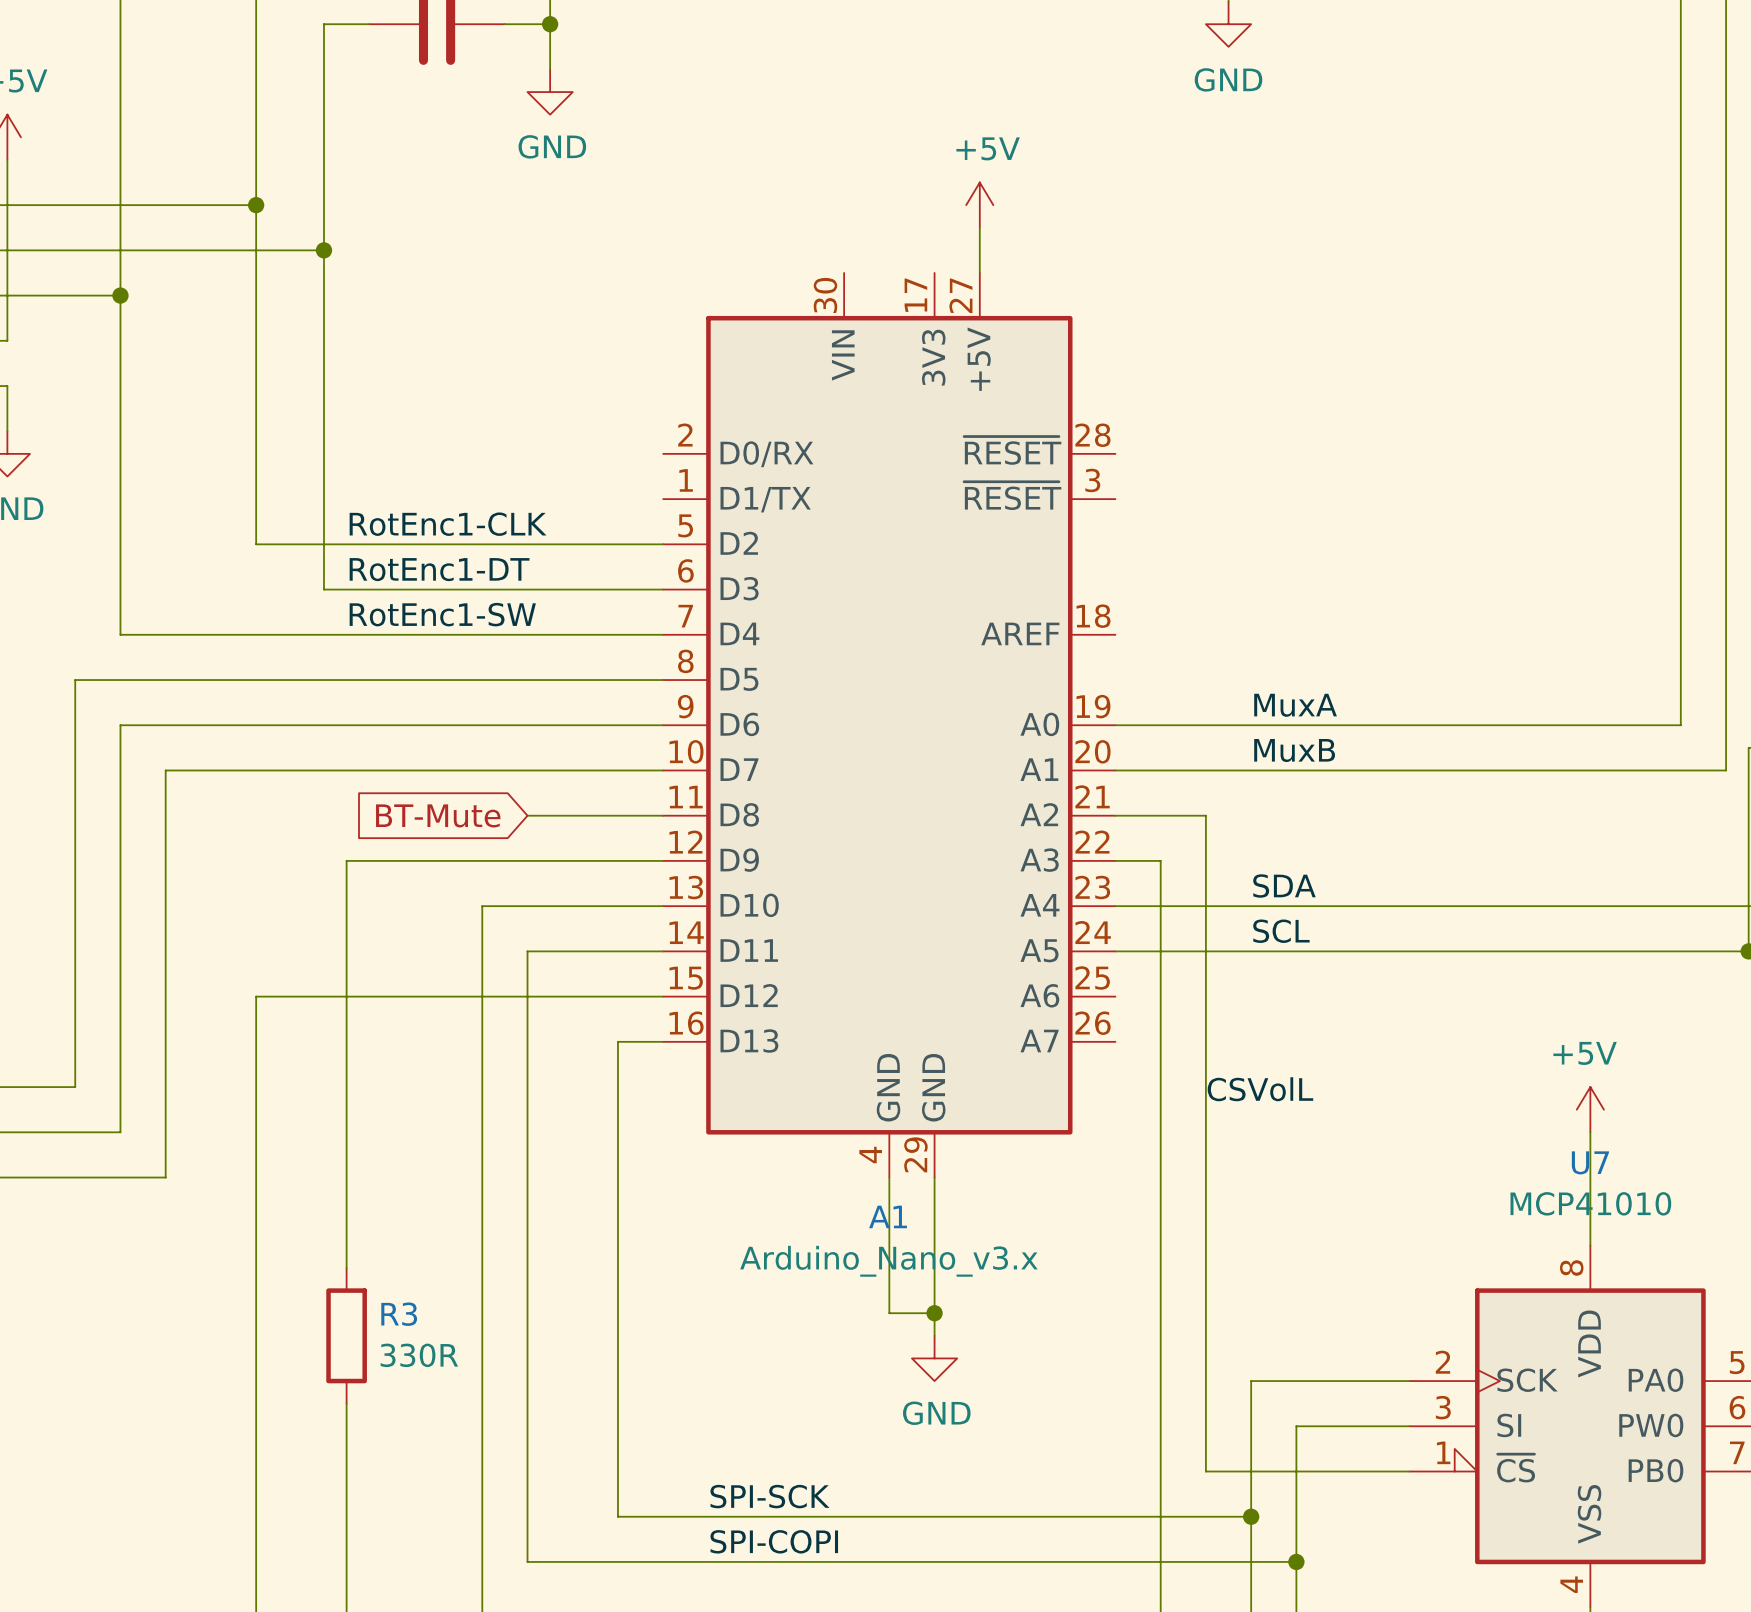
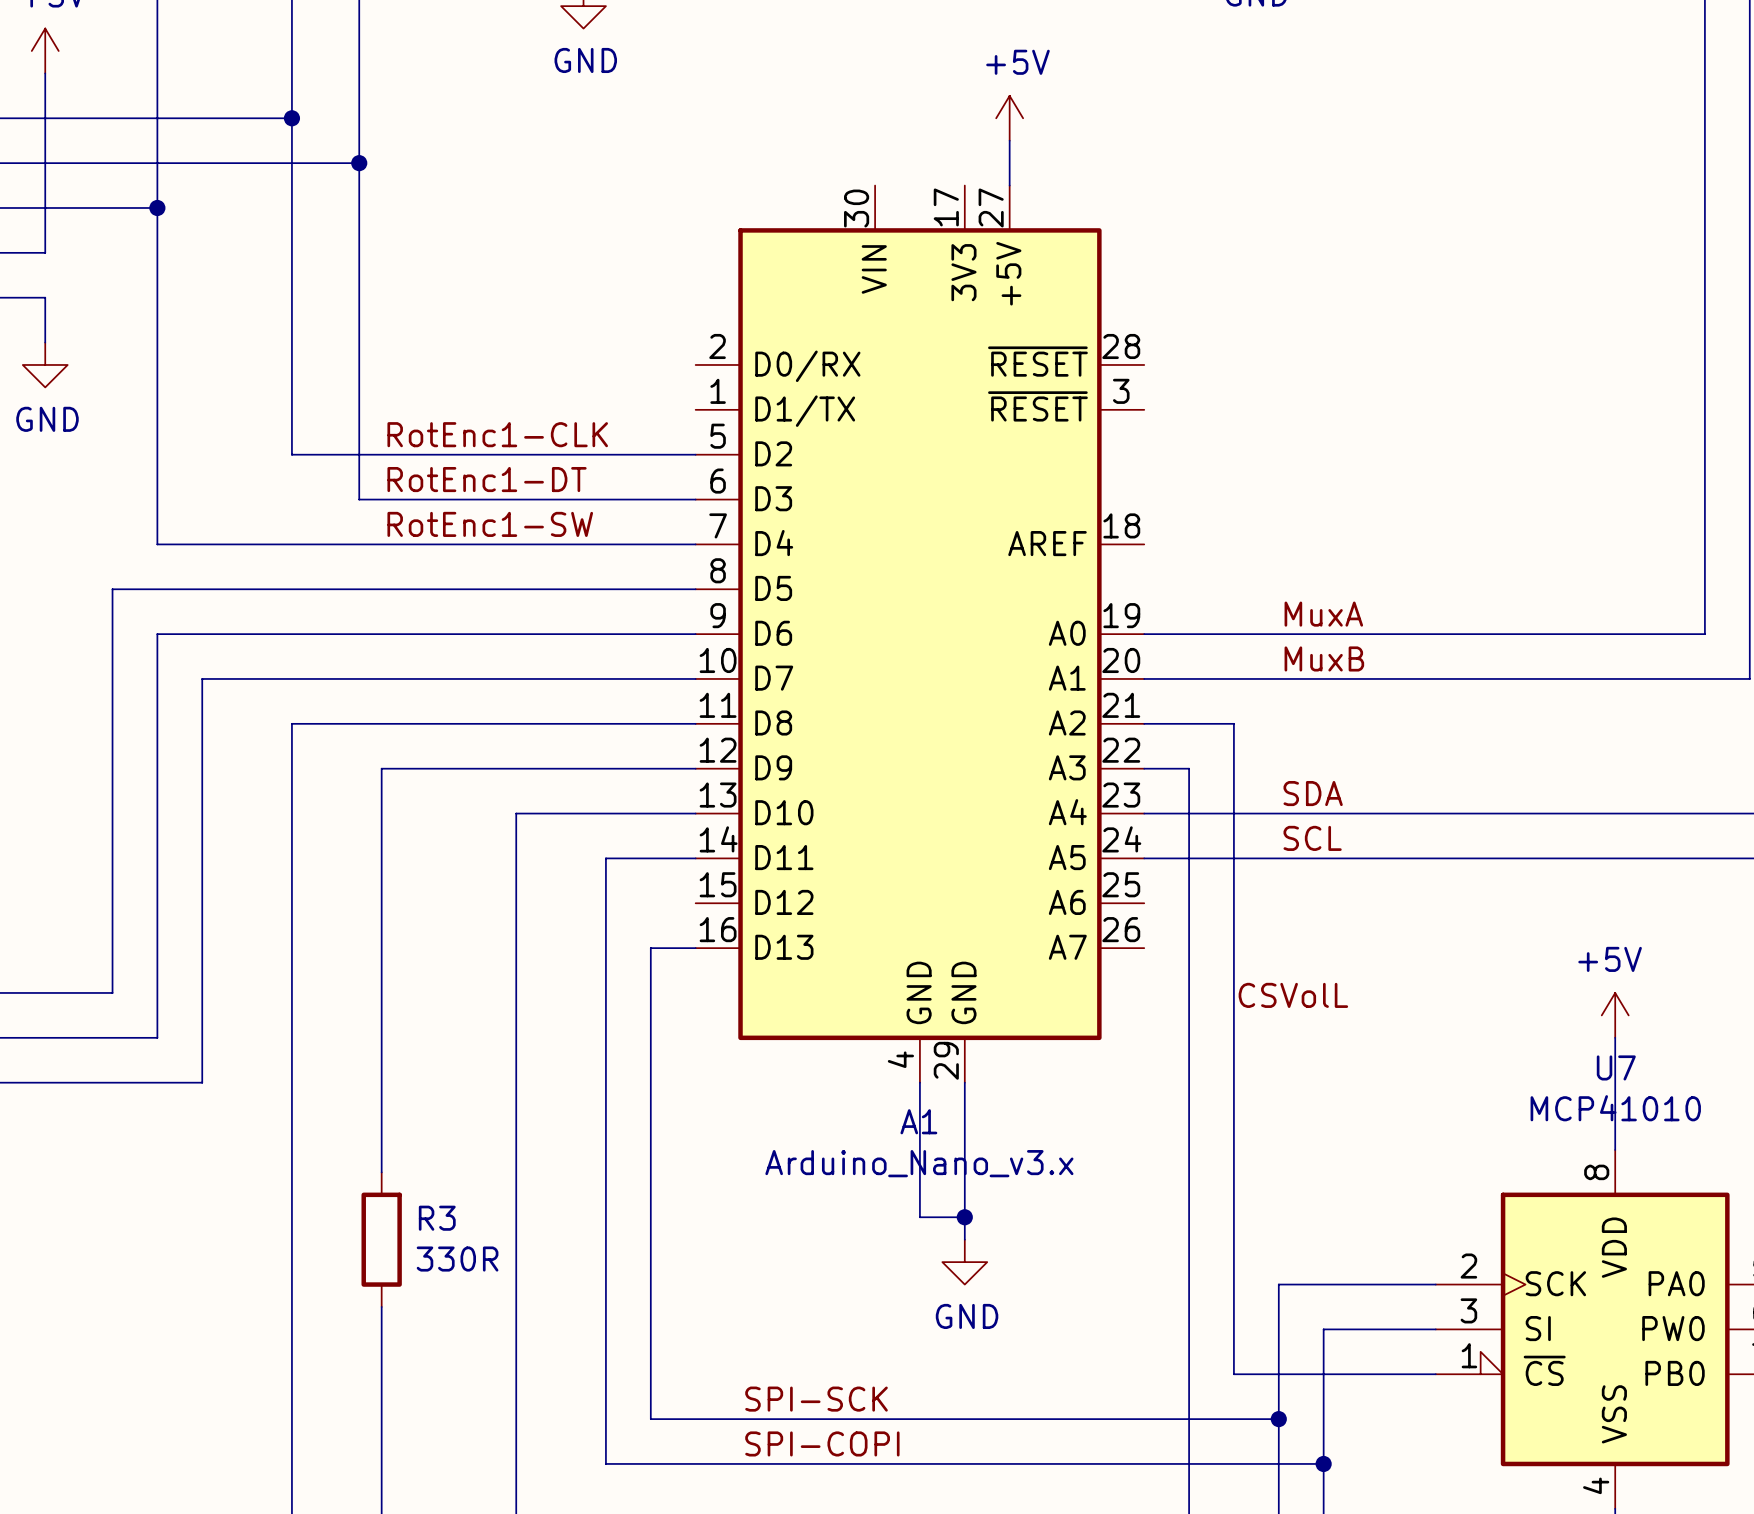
global label: BT-Mute (438, 815) -> none
wire: (572, 951) (527, 951) (527, 1561) (572, 1561) -> (605, 858) (605, 1463)
wire: (256, 996) (663, 996) -> (291, 903) (291, 723) (561, 723)

